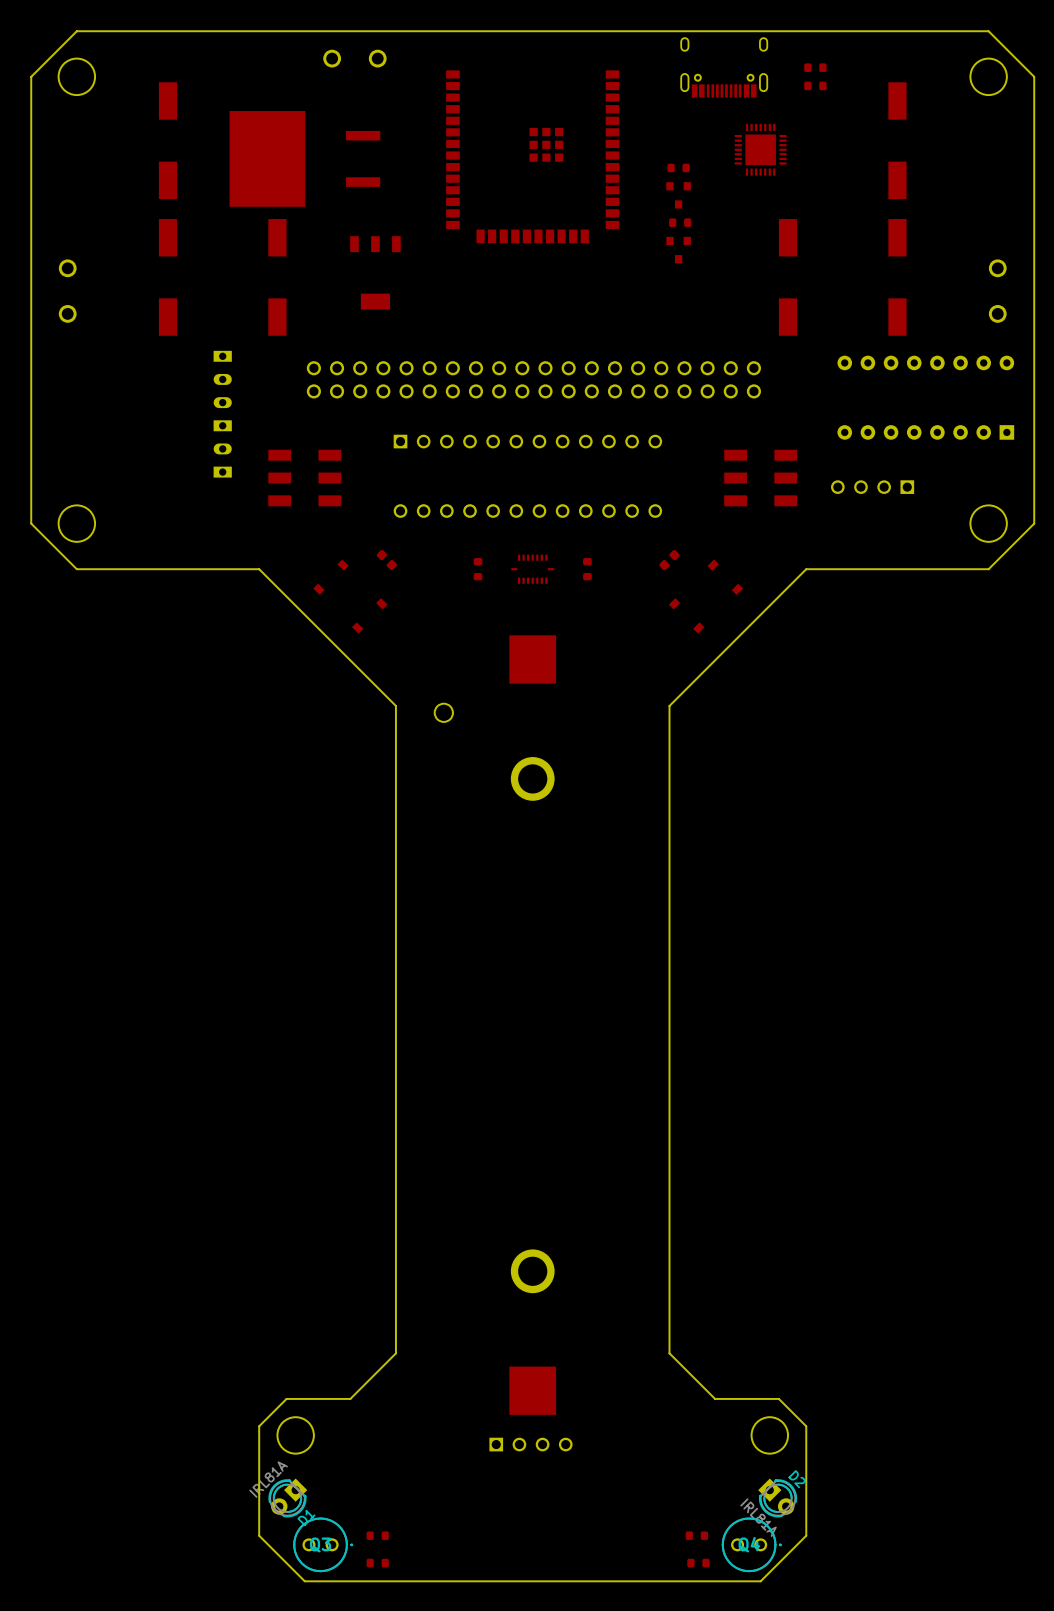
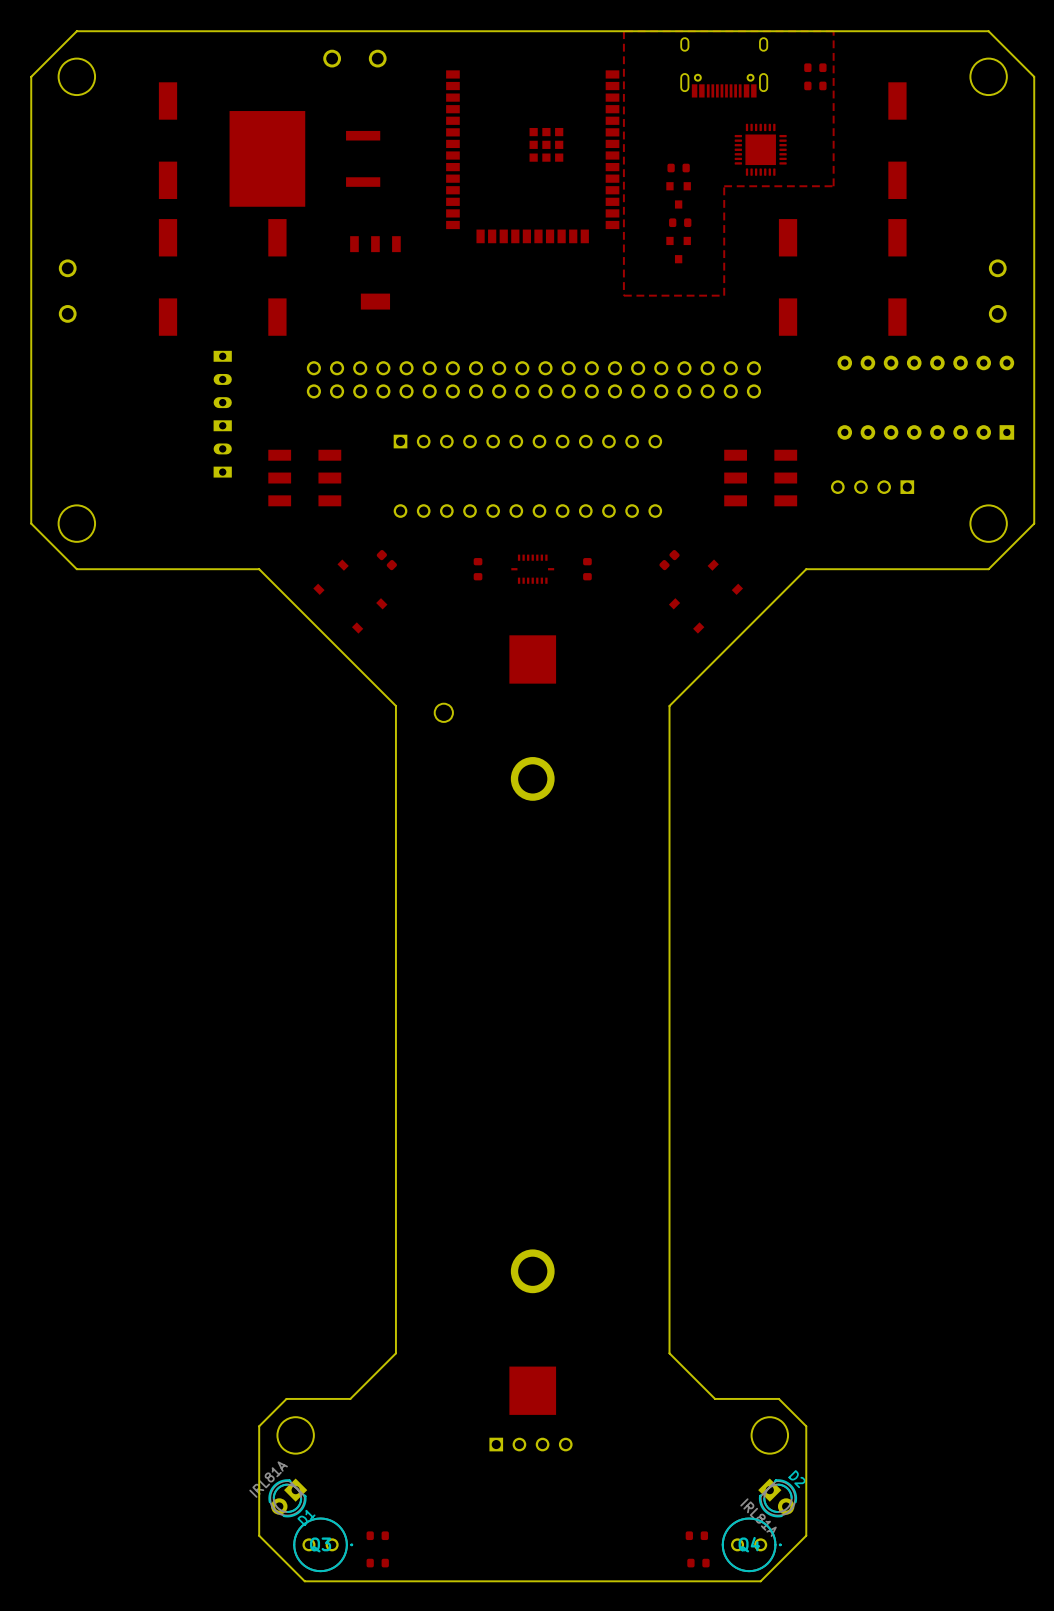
top zone outline: none -> (833, 31) (833, 186) (724, 186) (724, 295) (623, 295) (623, 31) (833, 31)

